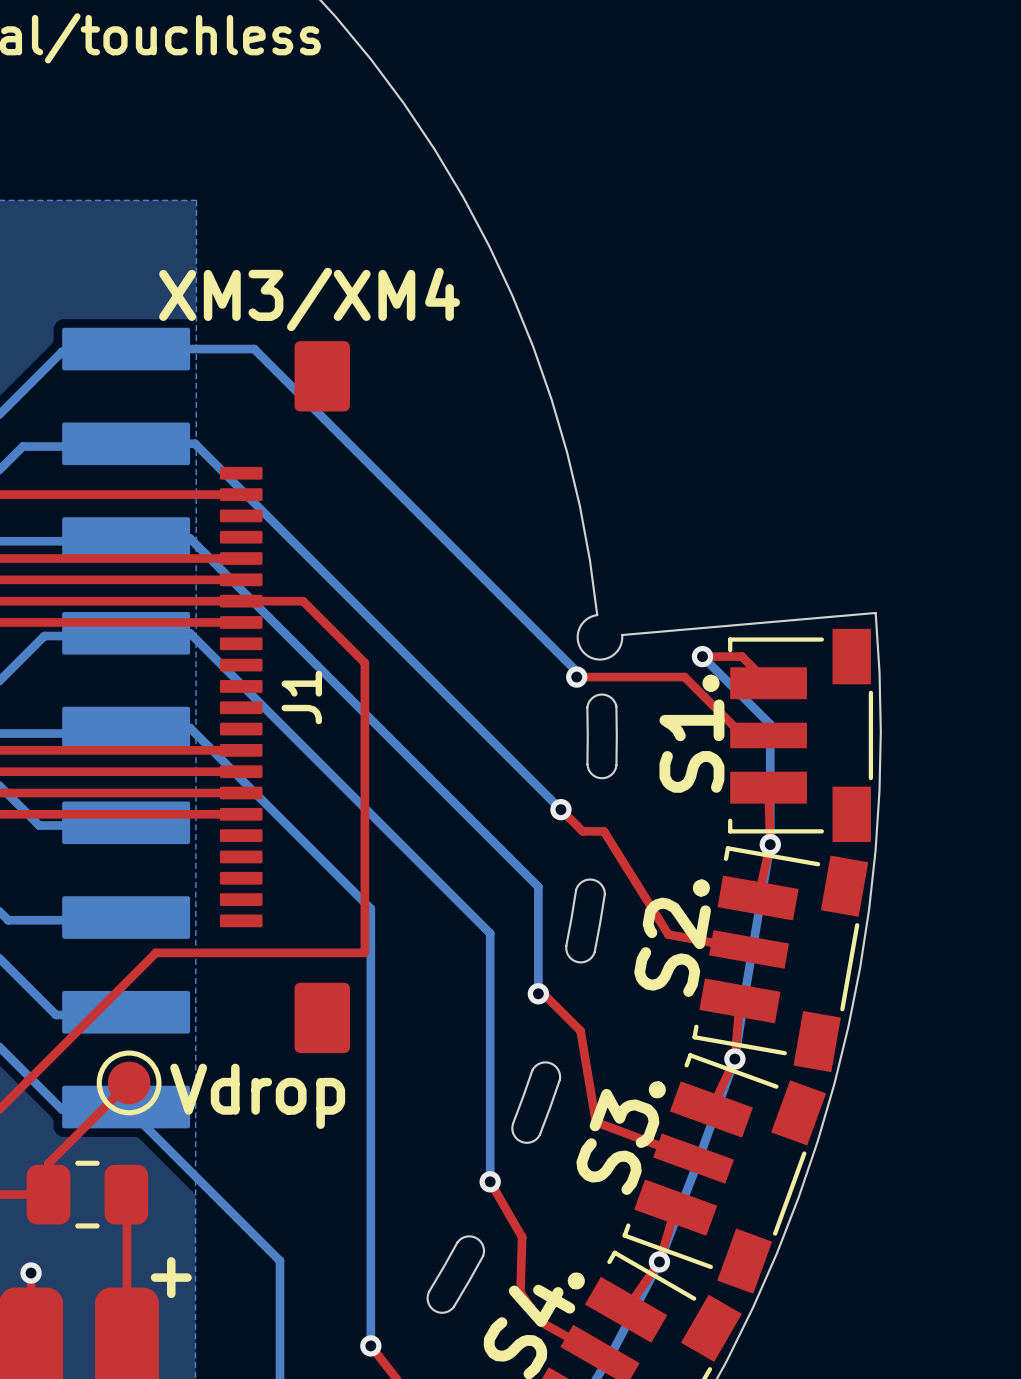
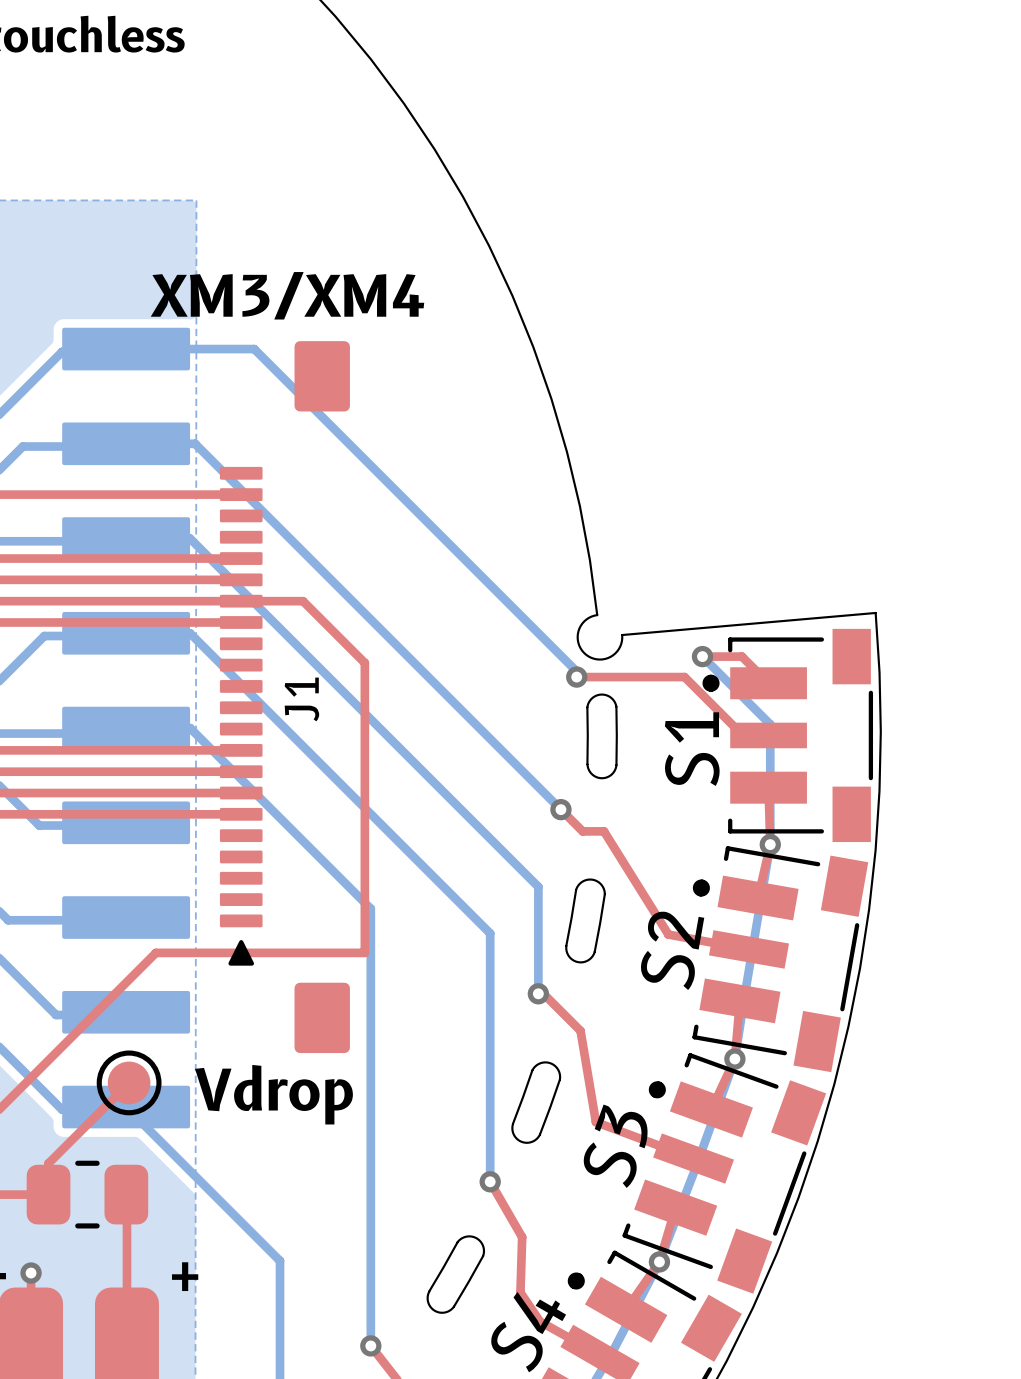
J1 footprint: [219, 341, 350, 1054] -> [219, 341, 350, 1054]

